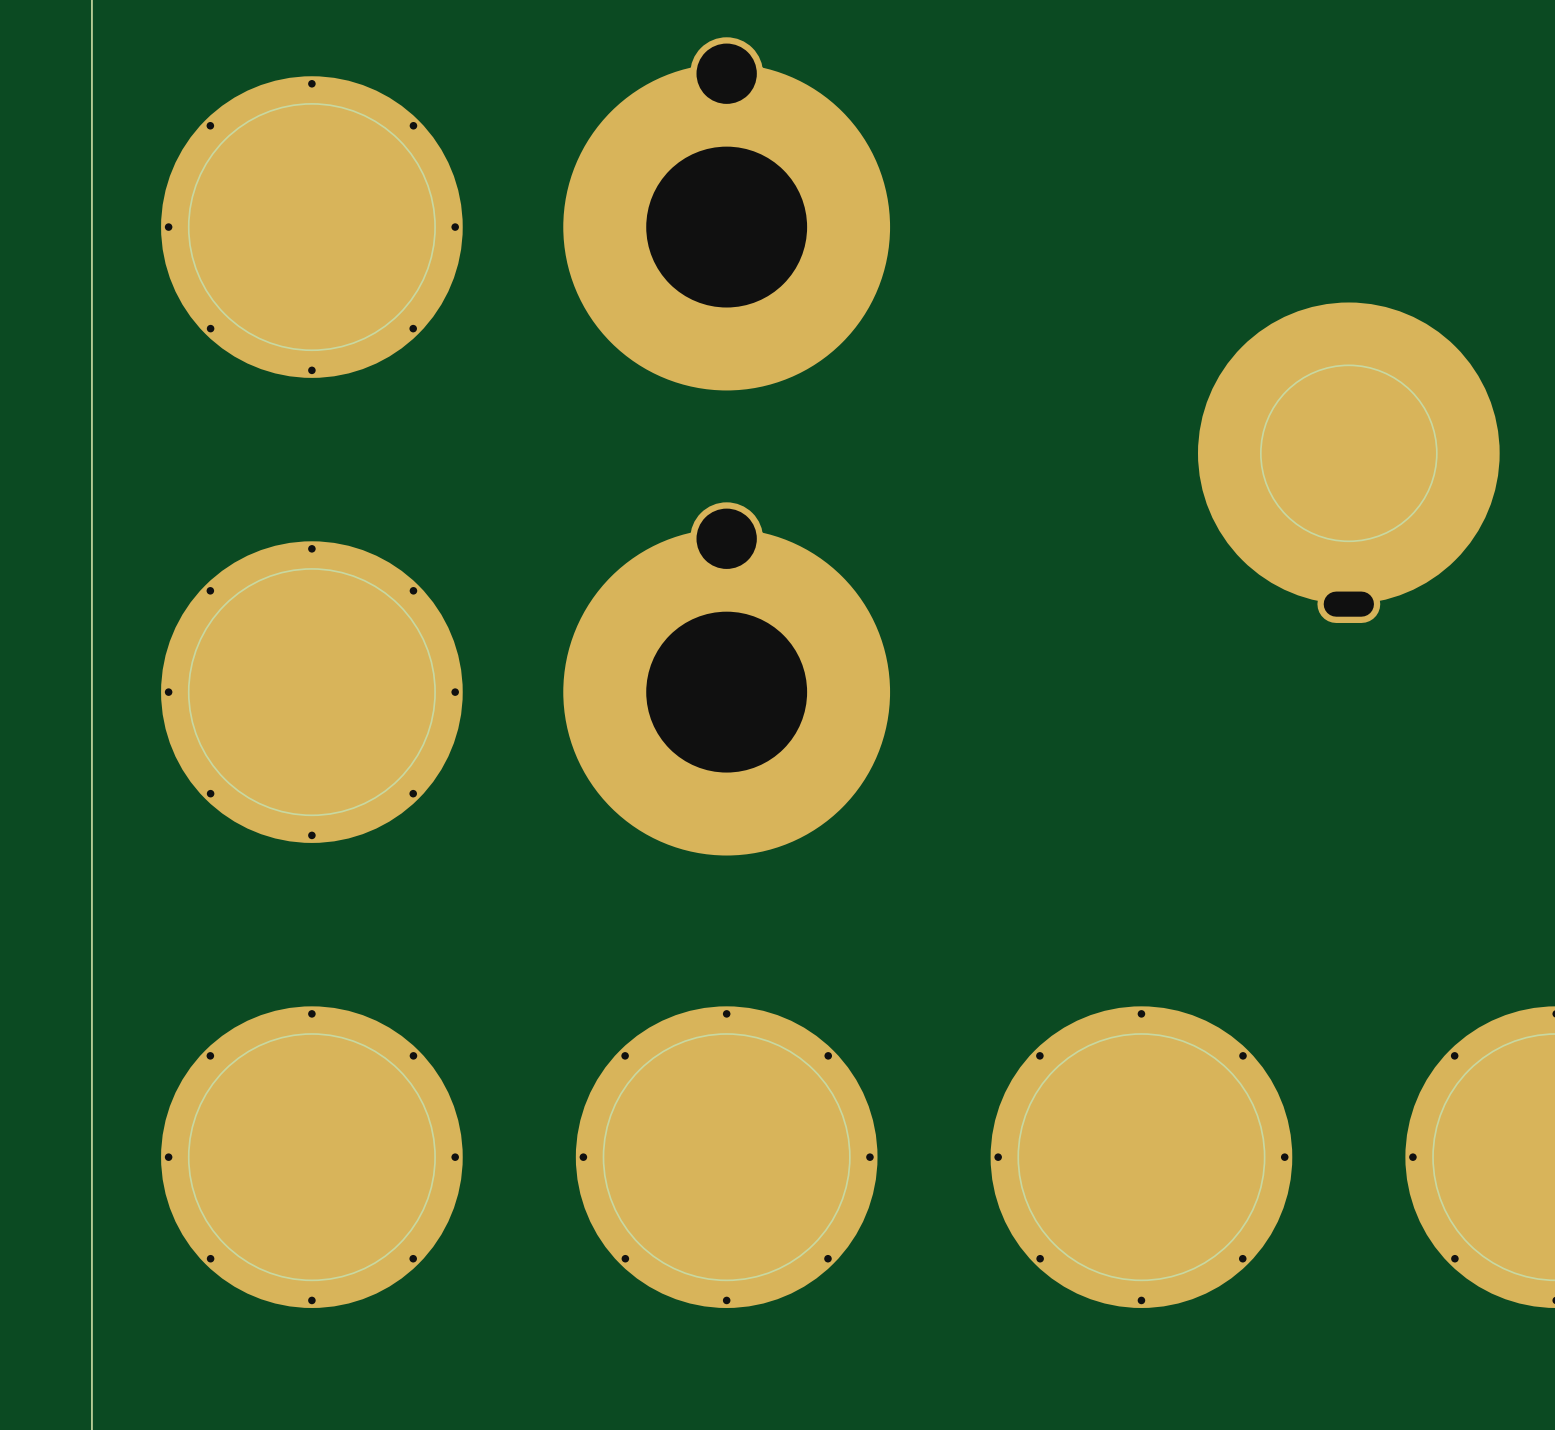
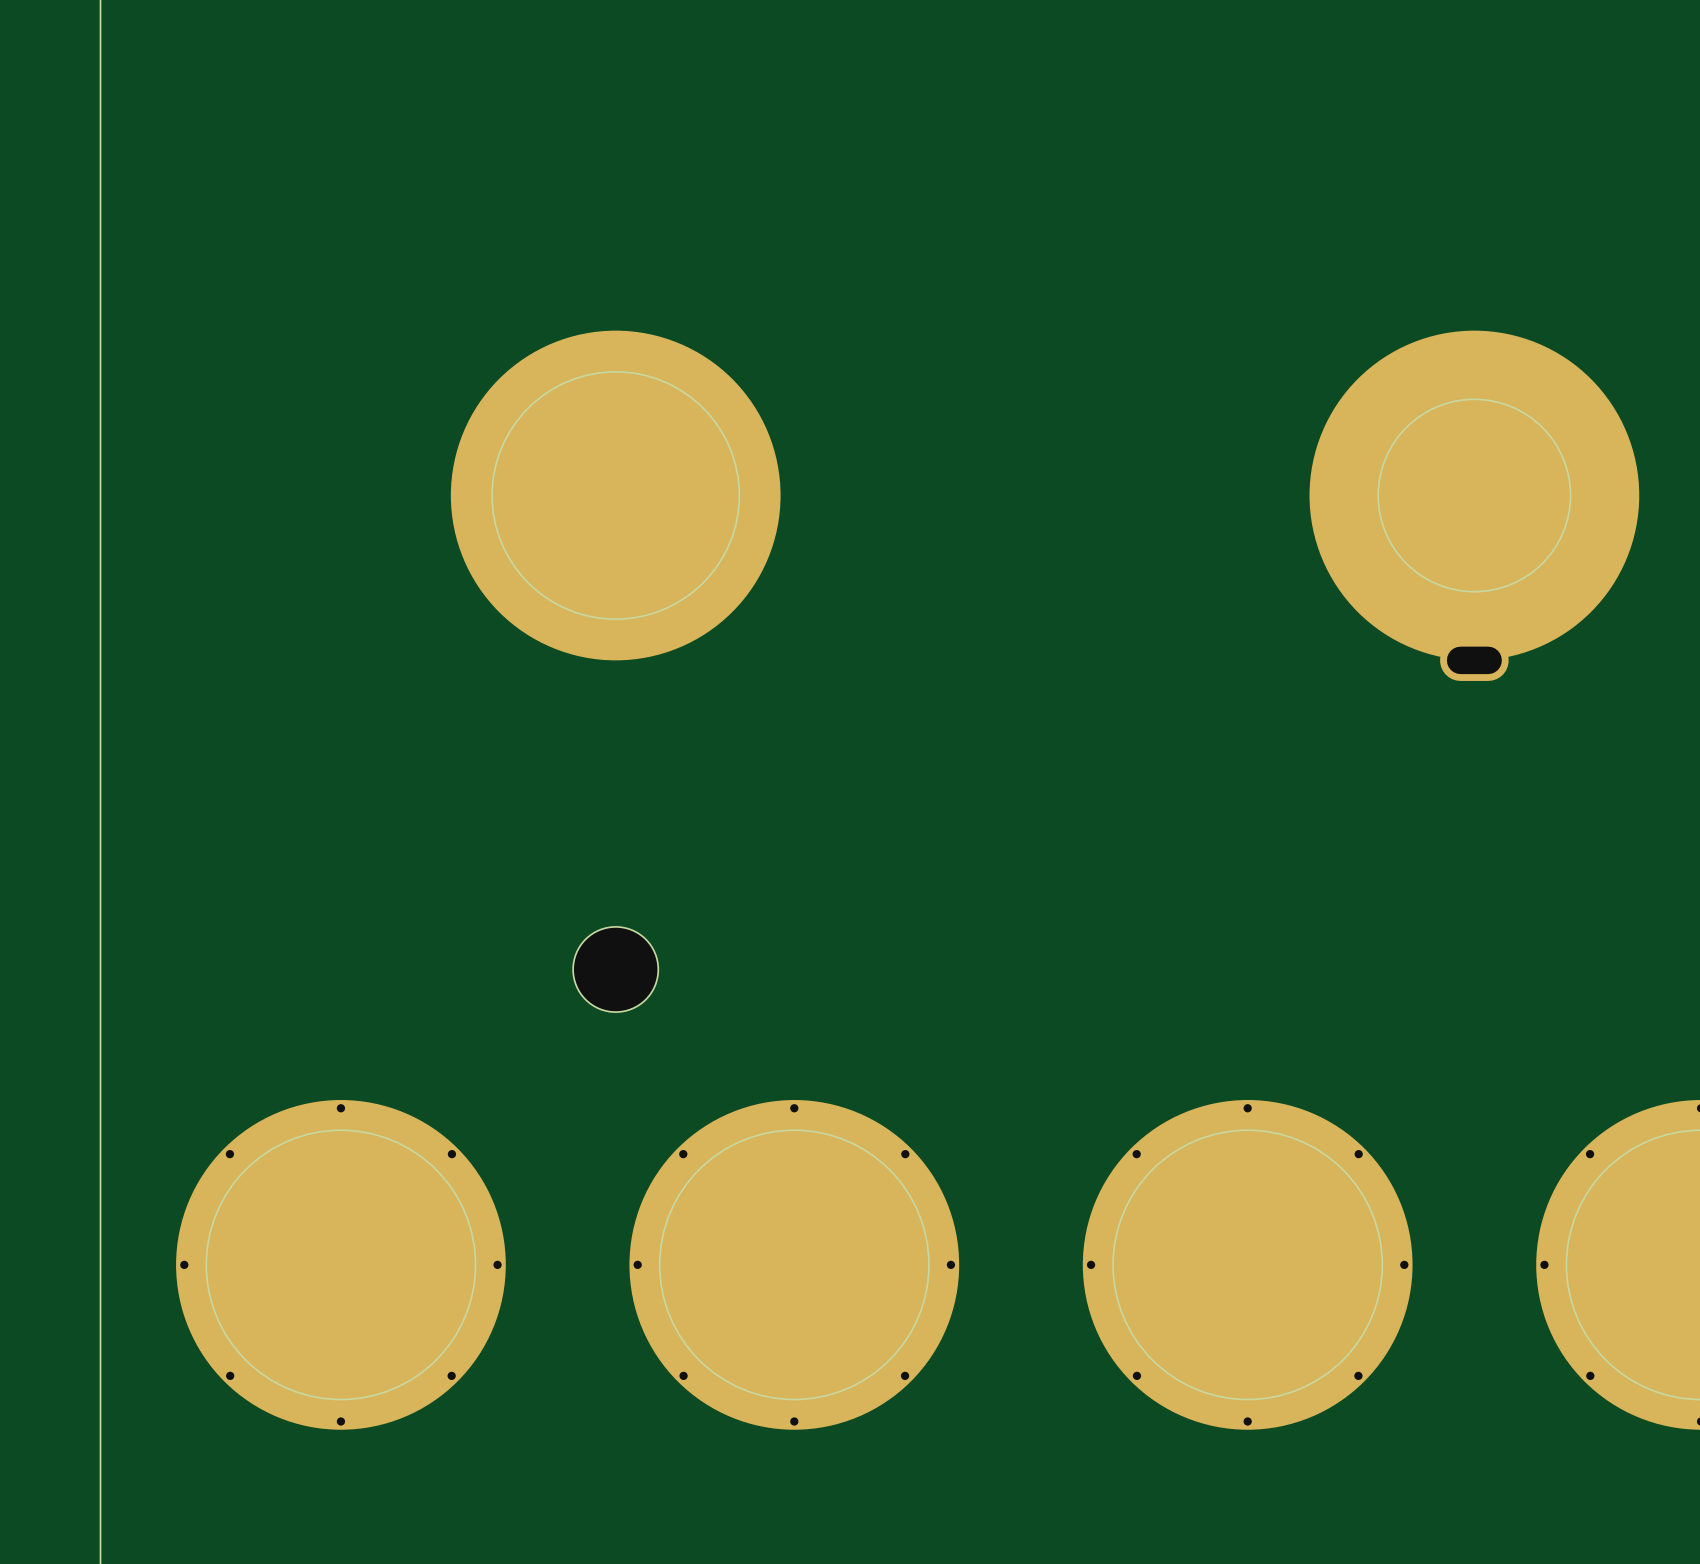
part: (726, 213) -> none
part: (311, 227) -> none
part: none -> (615, 495)
part: (726, 678) -> none
part: (311, 692) -> none
part: none -> (615, 969)

